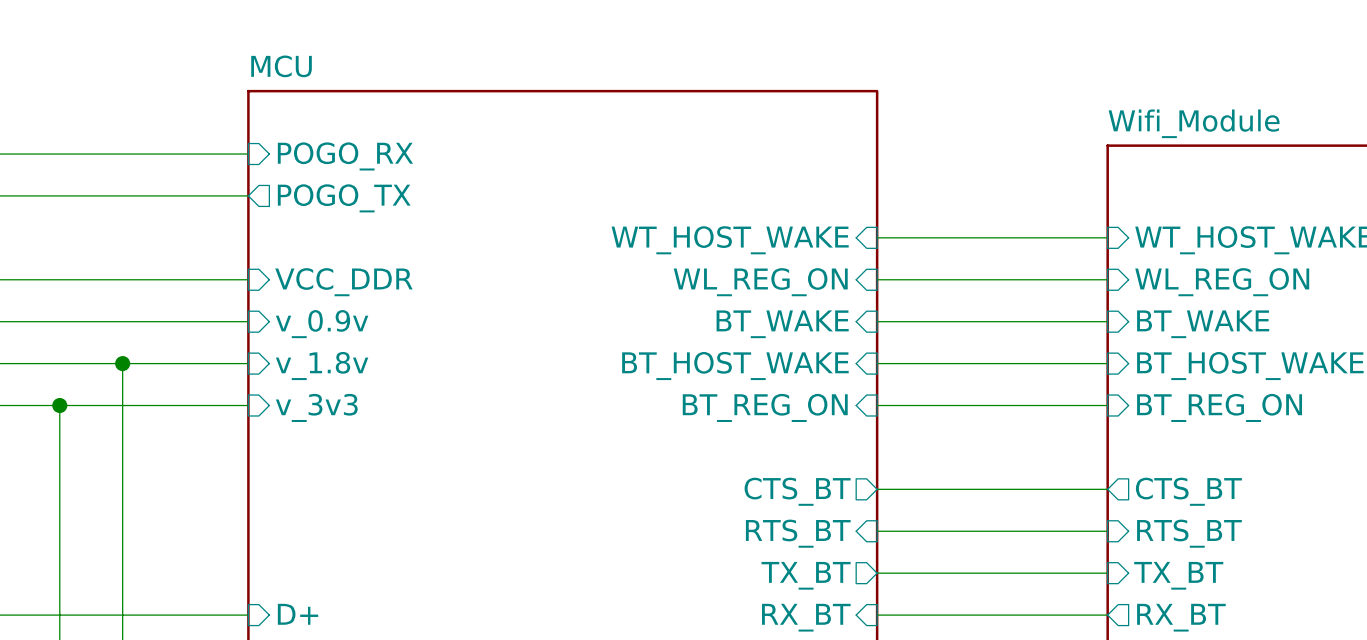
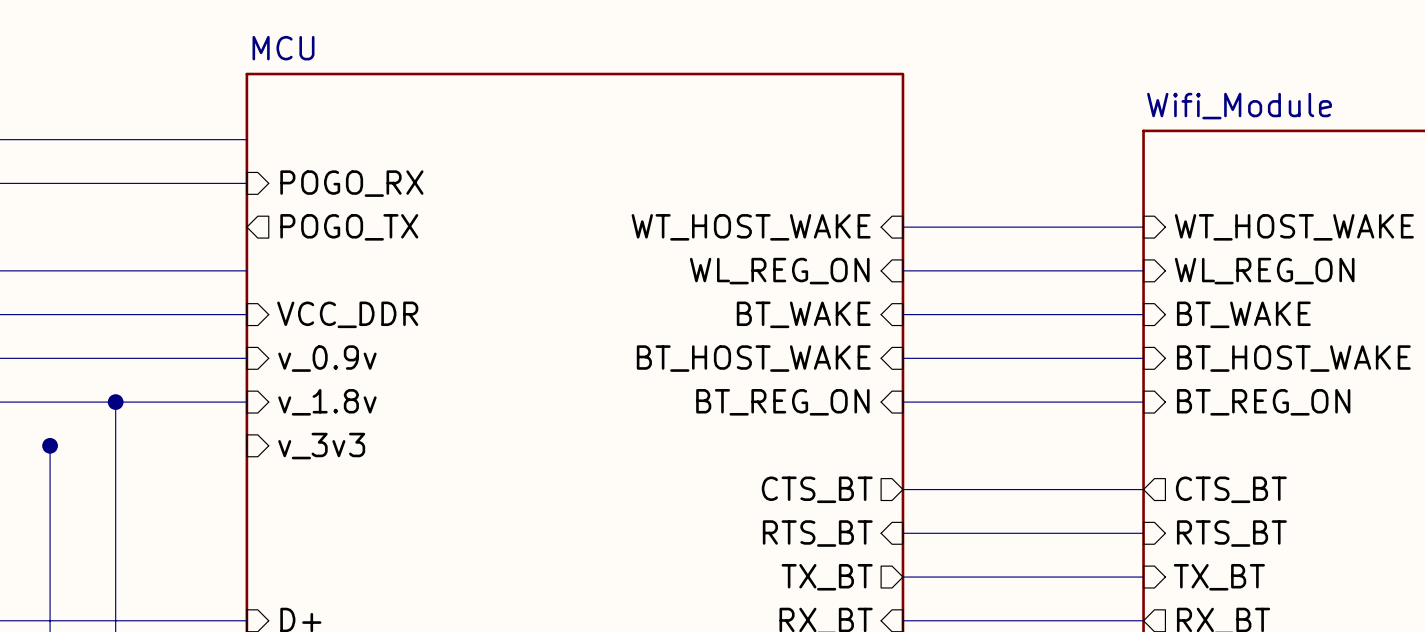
sheet pin: POGO_RX (345, 156) -> none
sheet pin shape: output (344, 198) -> input (351, 183)
sheet pin: POGO_TX (344, 198) -> POGO_RX (351, 183)
sheet pin: none -> POGO_TX (349, 227)
sheet pin: VCC_DDR (343, 282) -> none
sheet pin: v_0.9v (322, 324) -> VCC_DDR (347, 314)
wire: (122, 363) (122, 405) -> none
junction: (122, 363) -> none
sheet pin: v_1.8v (322, 366) -> v_0.9v (327, 358)
wire: (59, 405) (59, 447) -> none
junction: (59, 405) -> none
junction: none -> (115, 402)
sheet pin: v_3v3 (316, 407) -> v_1.8v (327, 402)
junction: none -> (50, 445)
sheet pin: none -> v_3v3 (321, 446)

